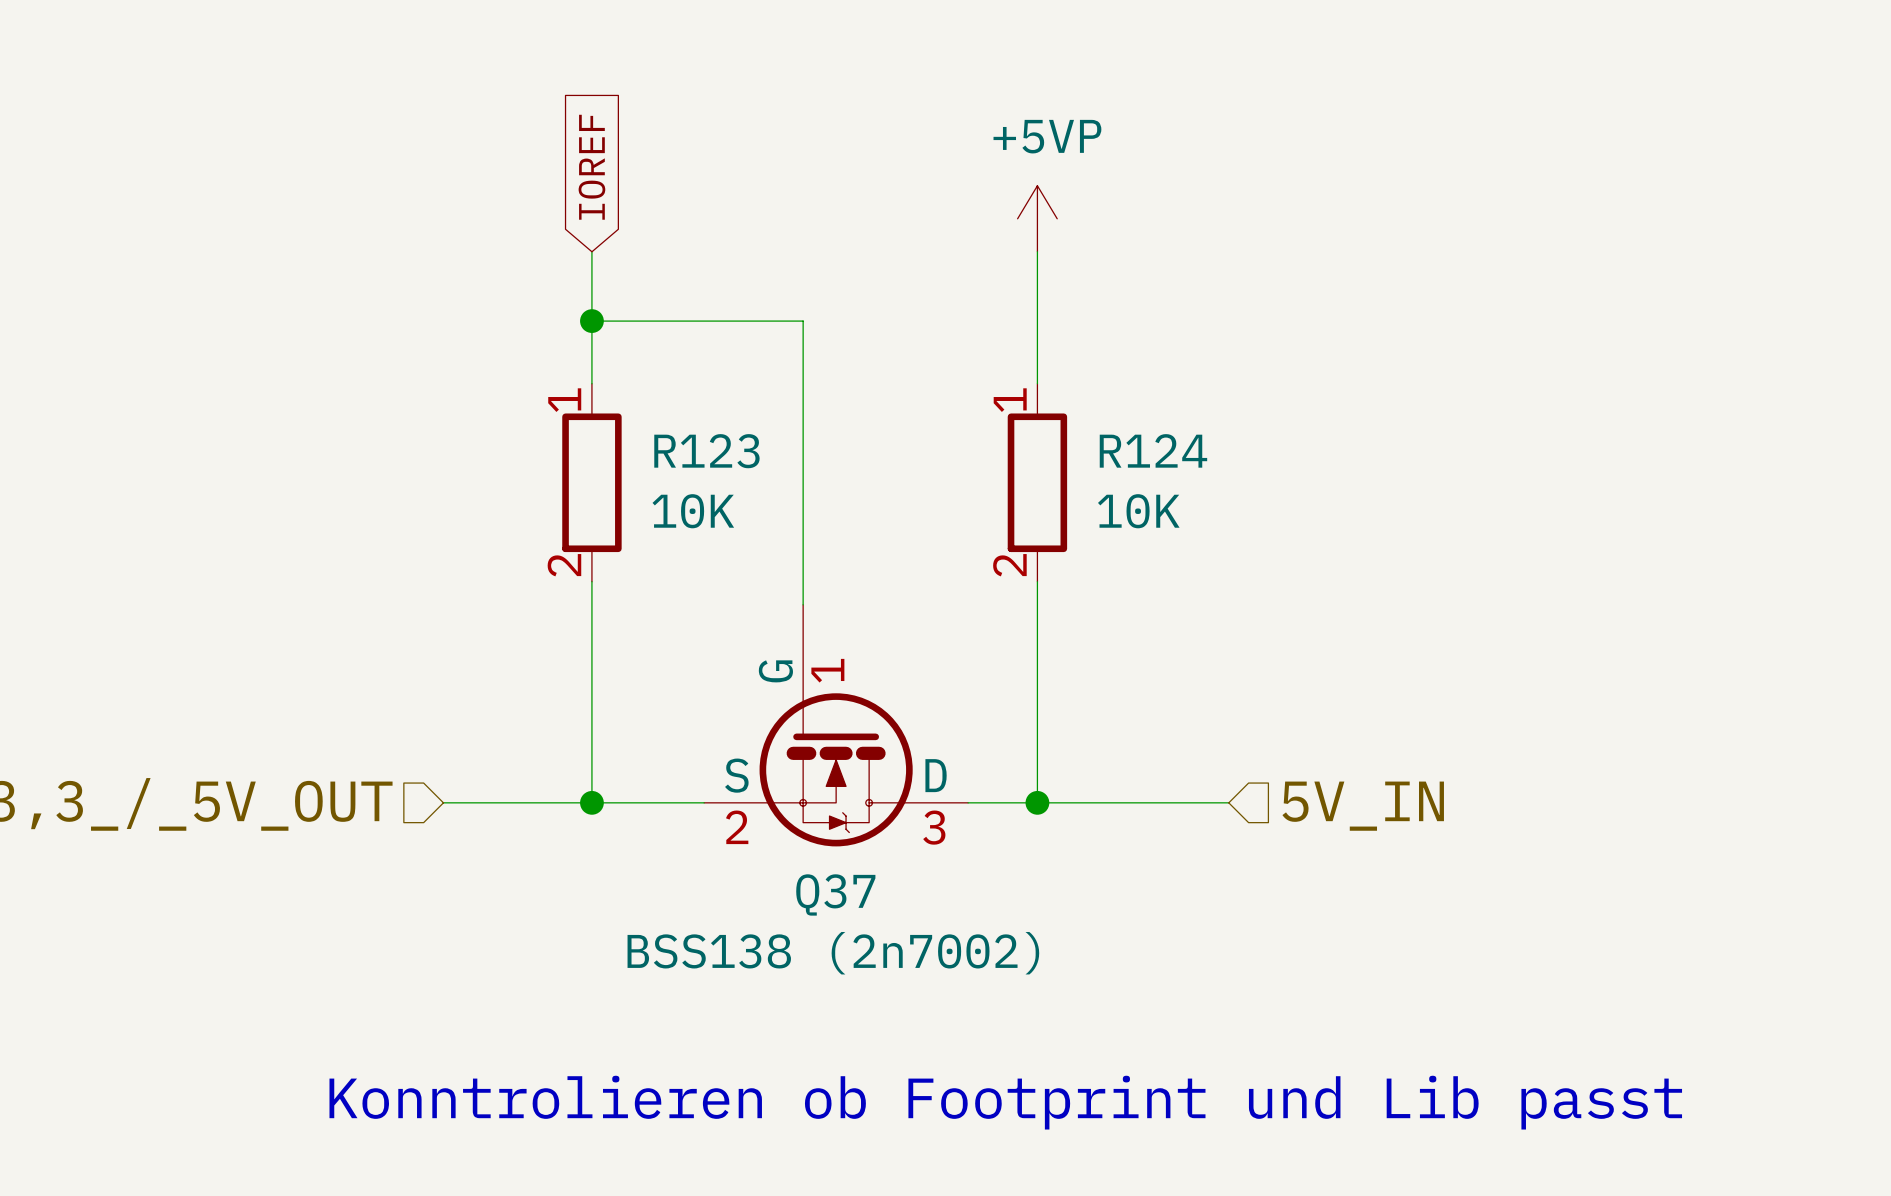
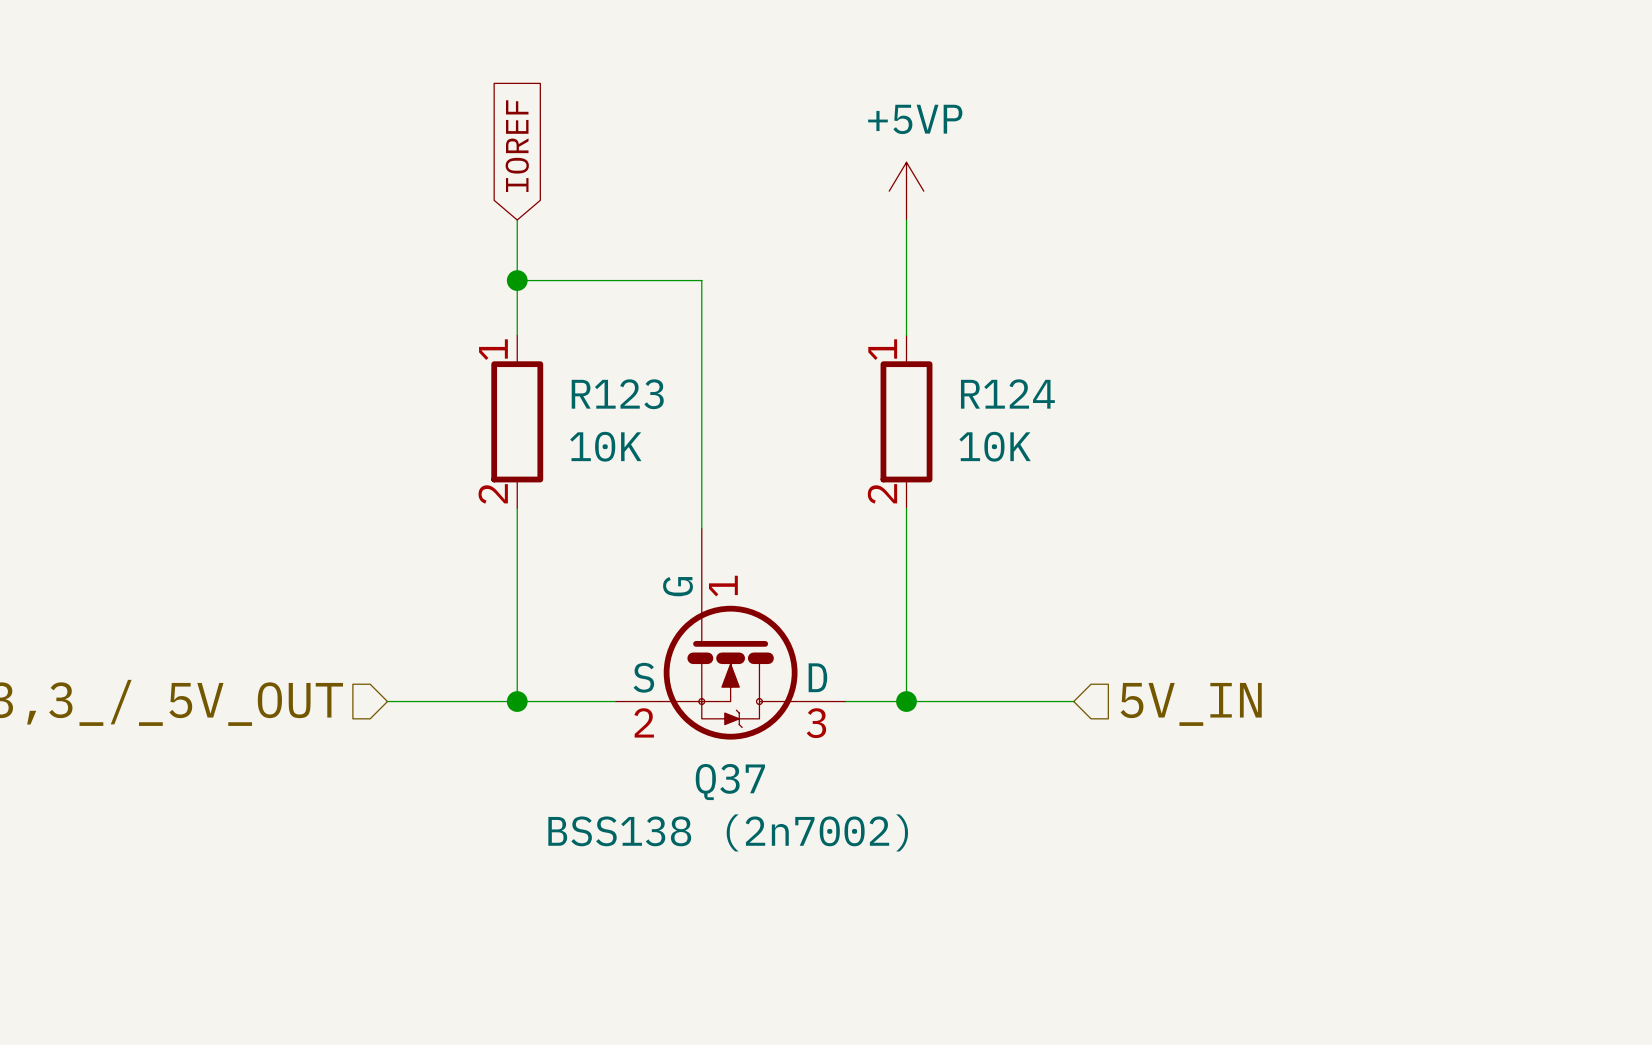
text: Konntrolieren ob Footprint und Lib passt (1005, 1102) -> none

